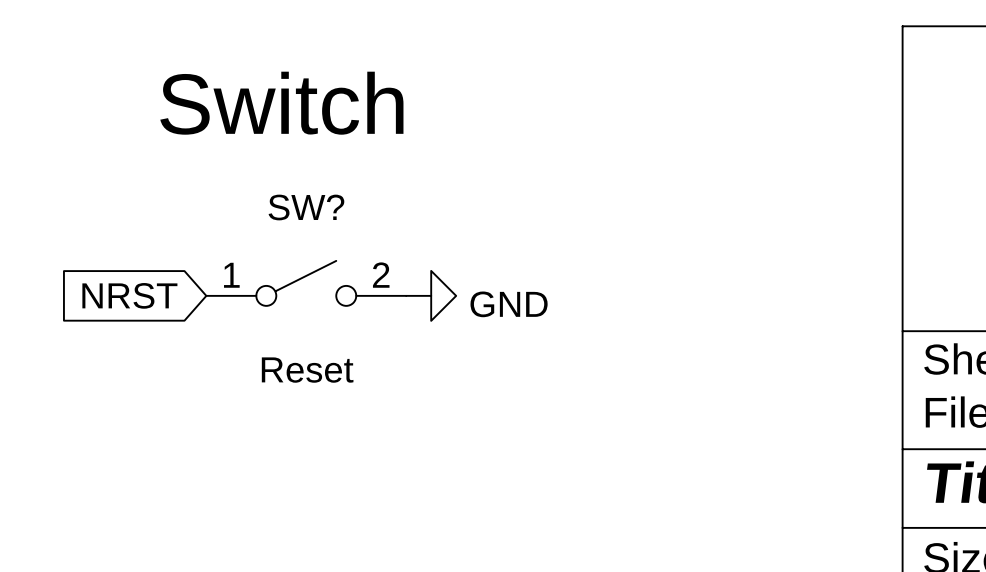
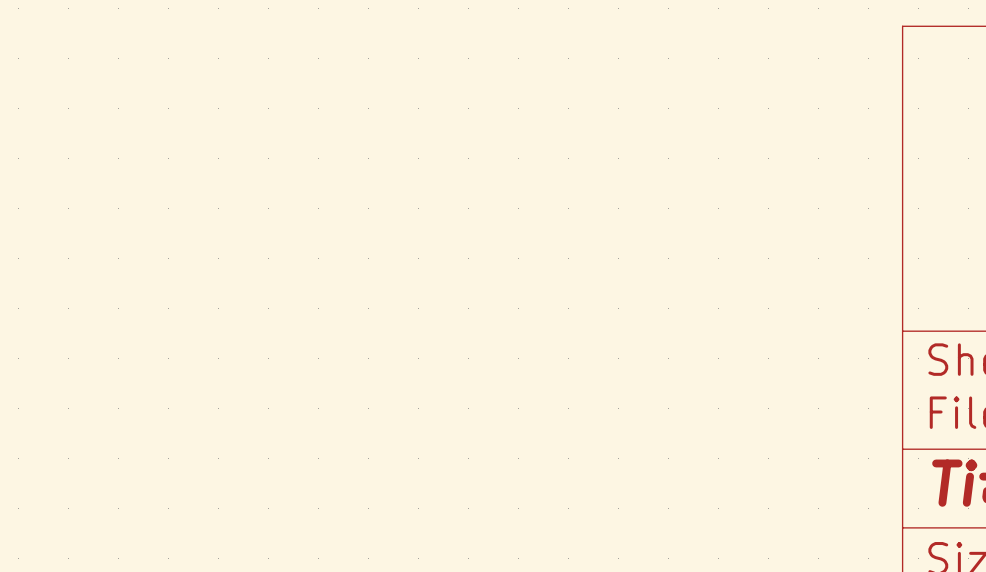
text: Switch (281, 103) -> none
SW?: Reset (306, 283) -> none
global label: NRST (129, 295) -> none
power symbol: GND (431, 295) -> none

